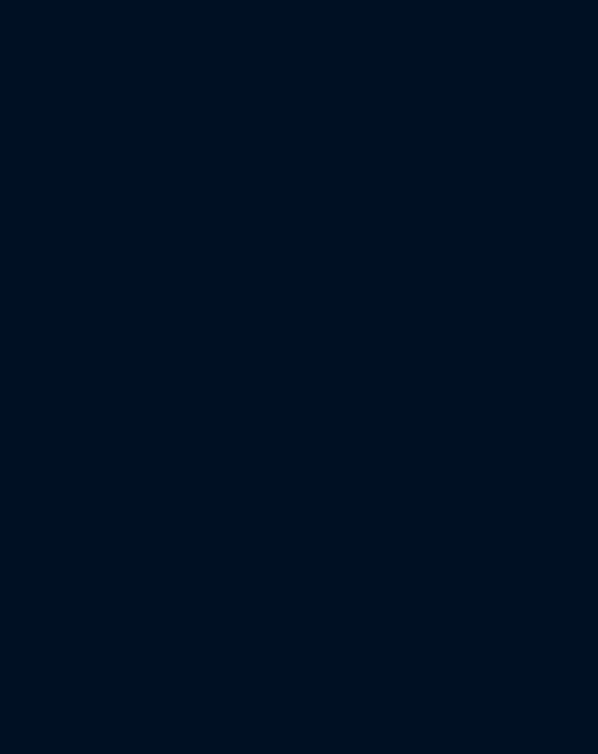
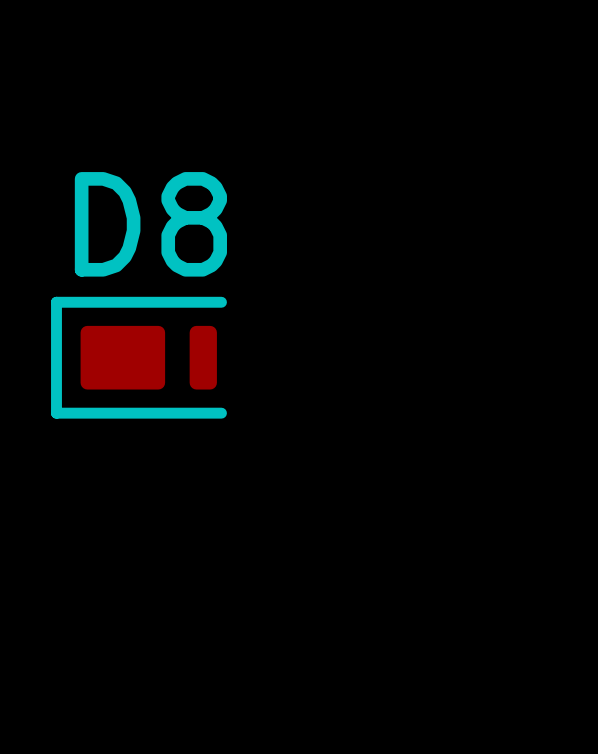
D8: none -> (138, 357)

